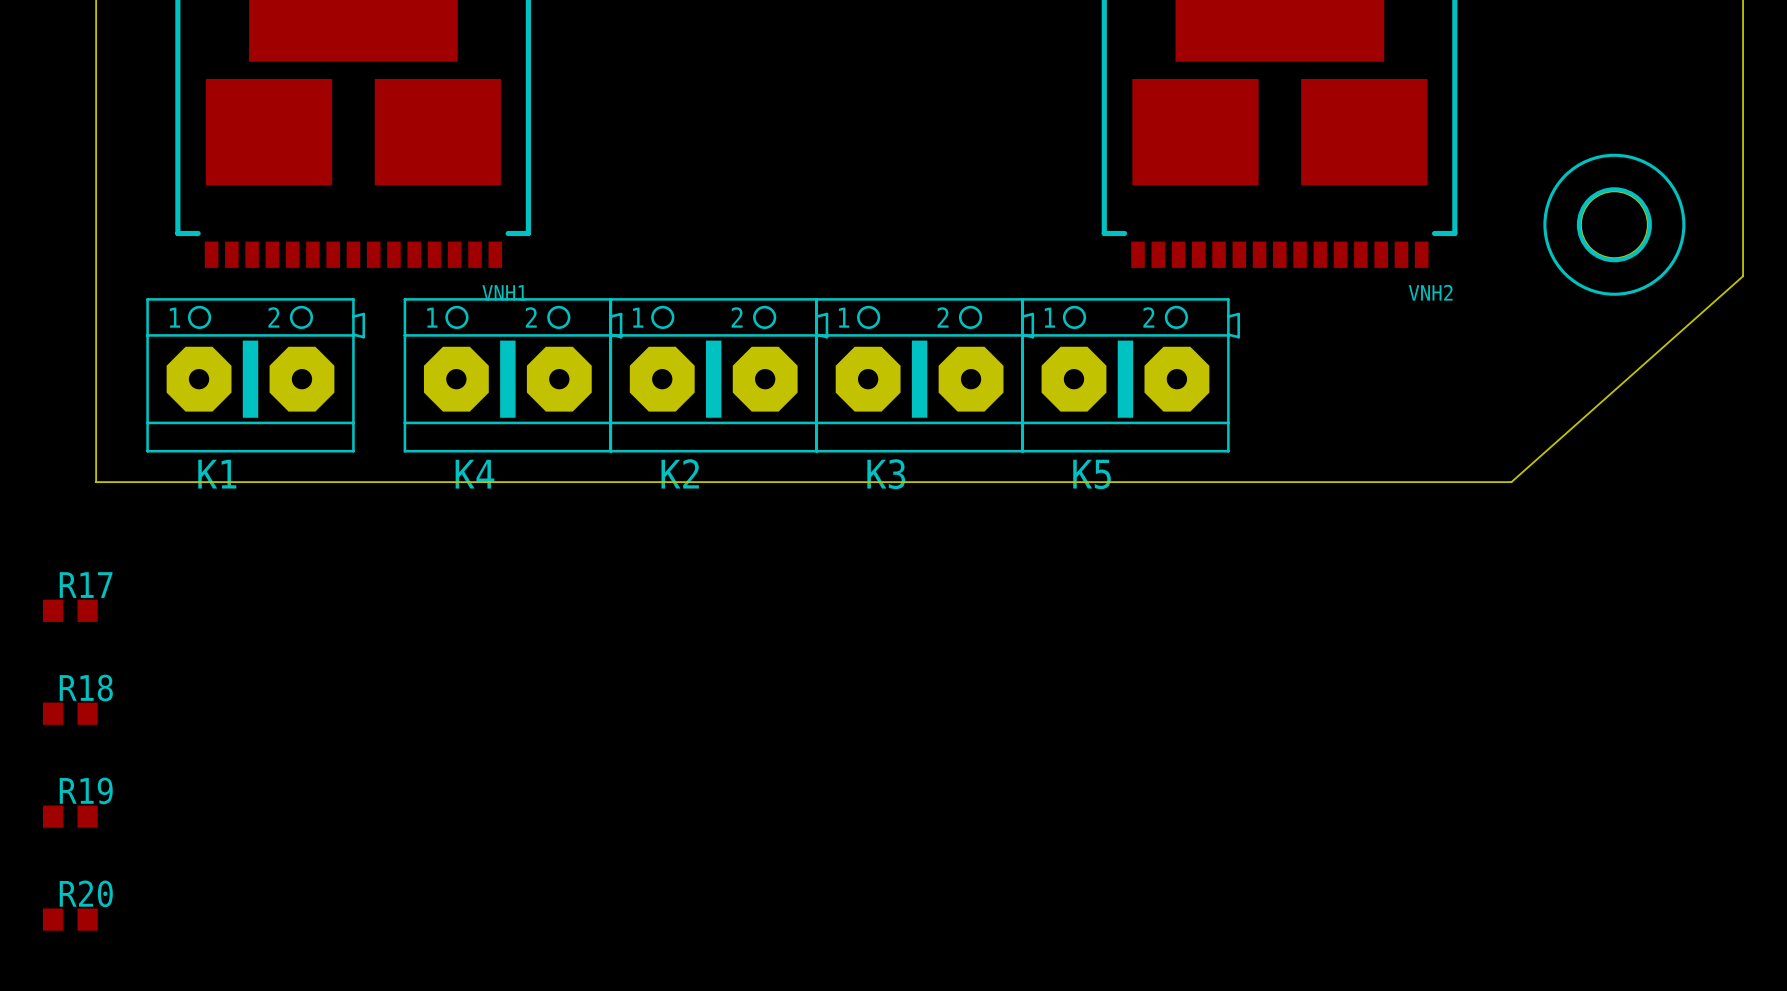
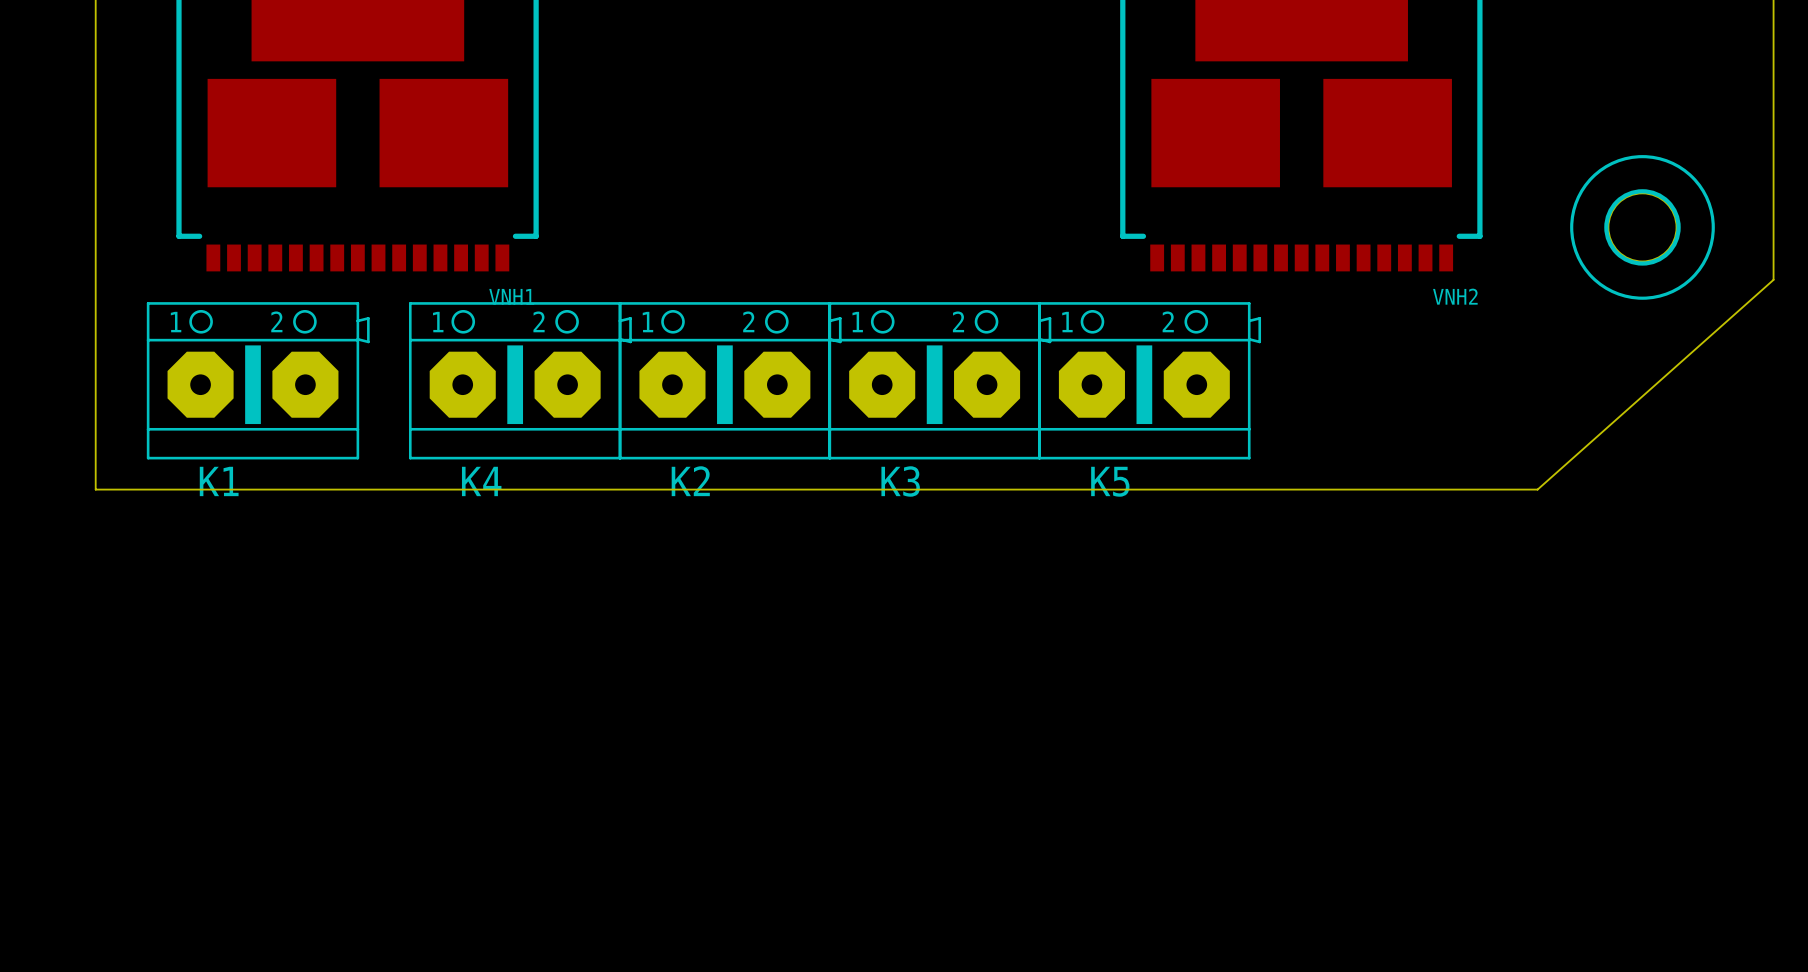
R17: (70, 610) -> none
R18: (70, 713) -> none
R19: (70, 816) -> none
R20: (70, 919) -> none

